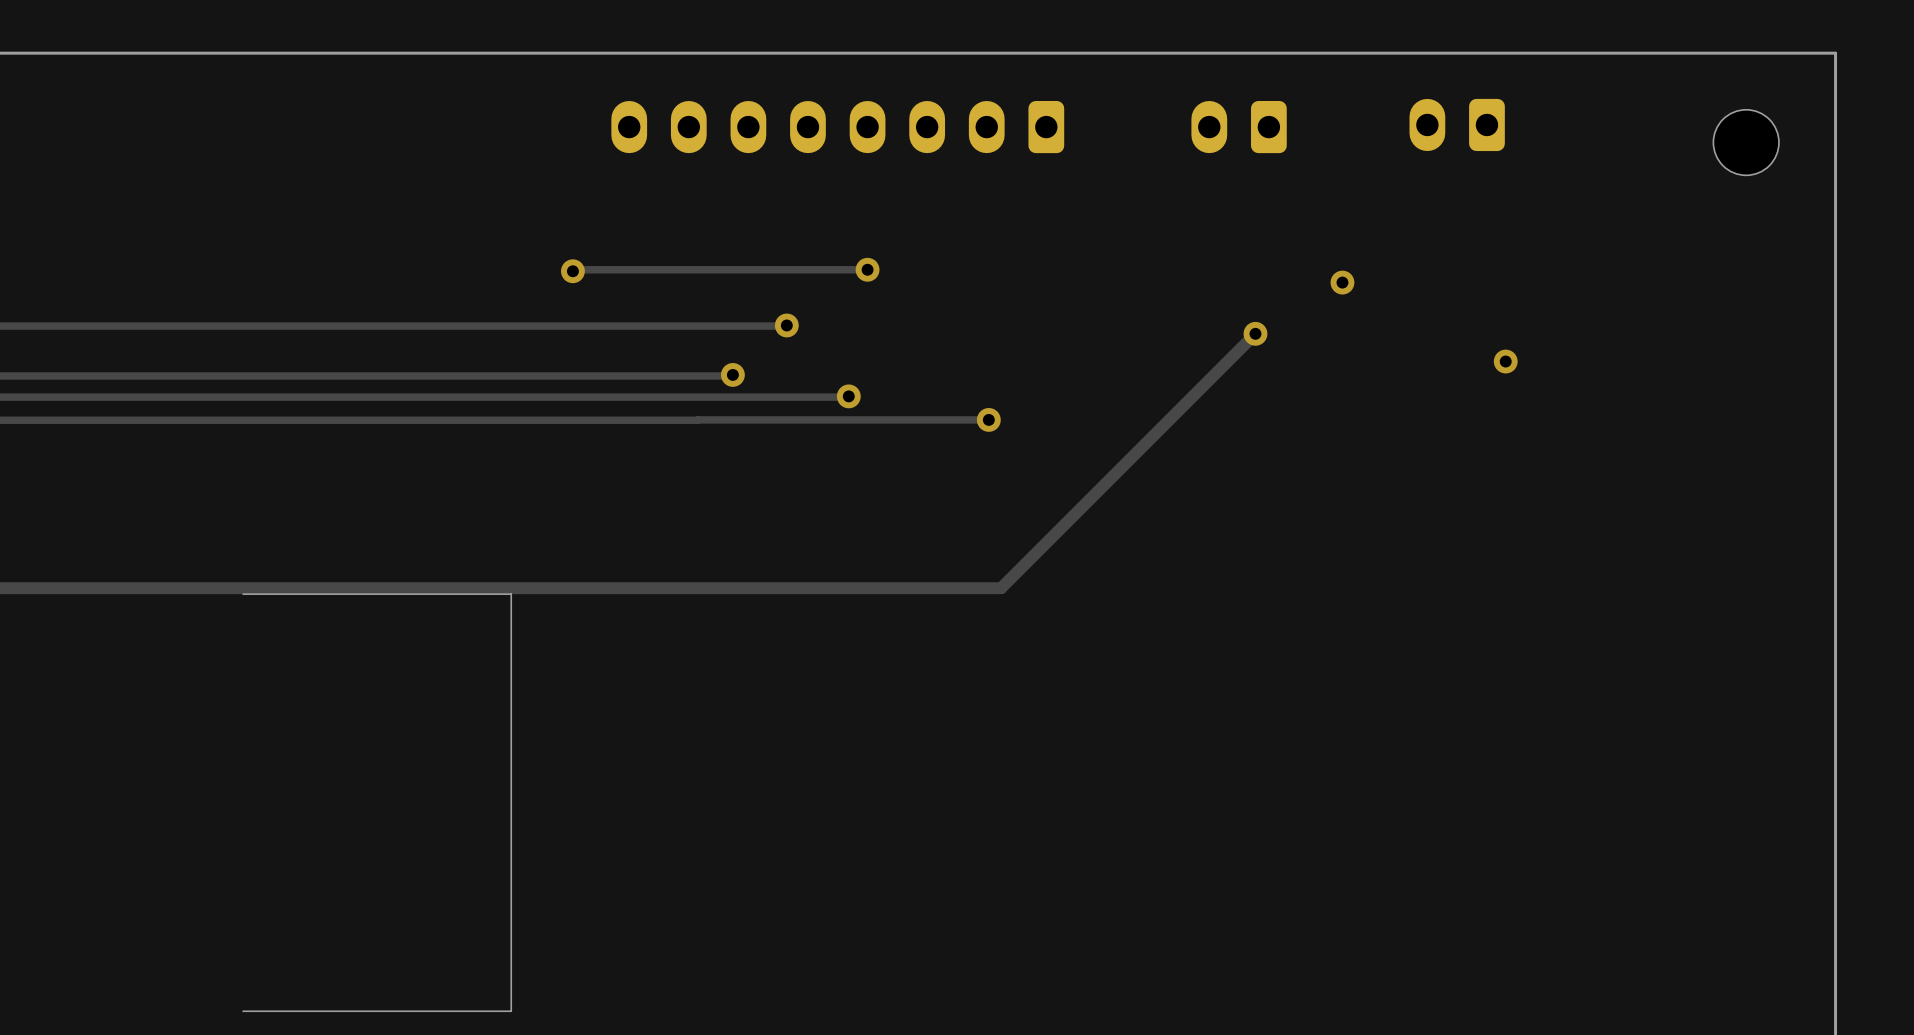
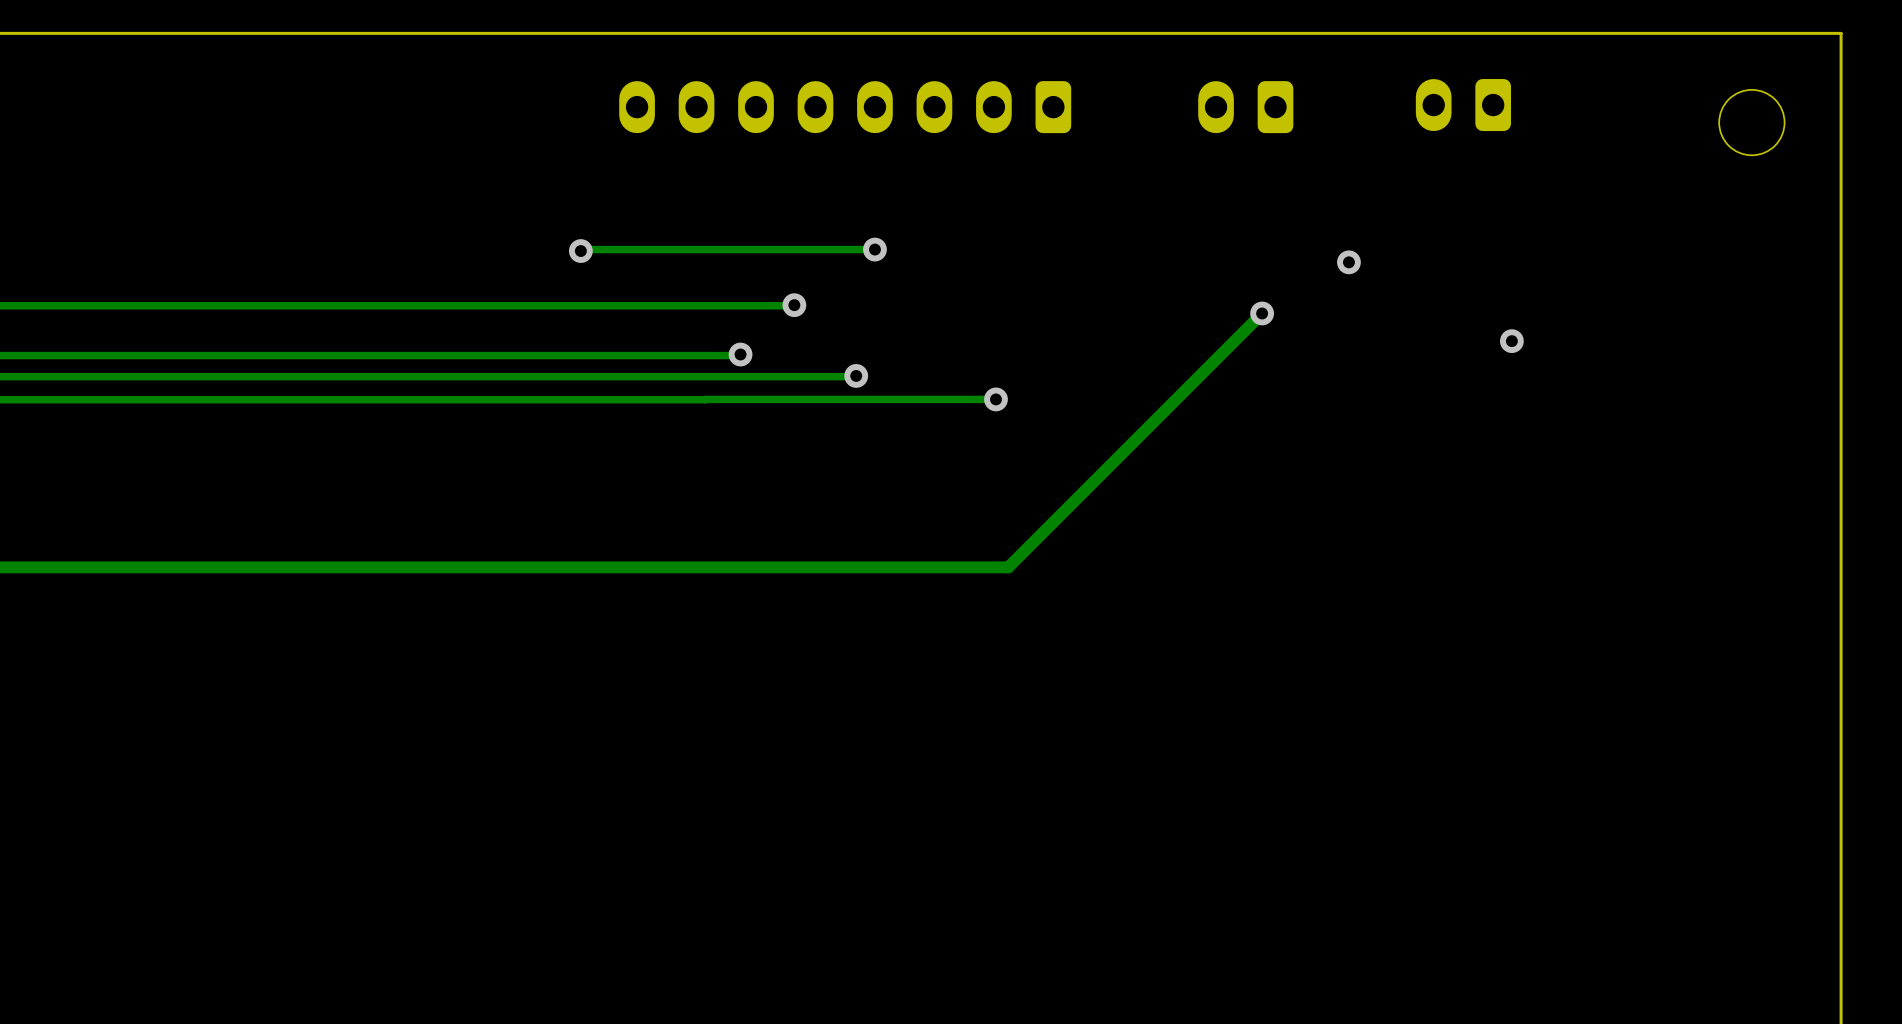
part: (377, 802) -> none

